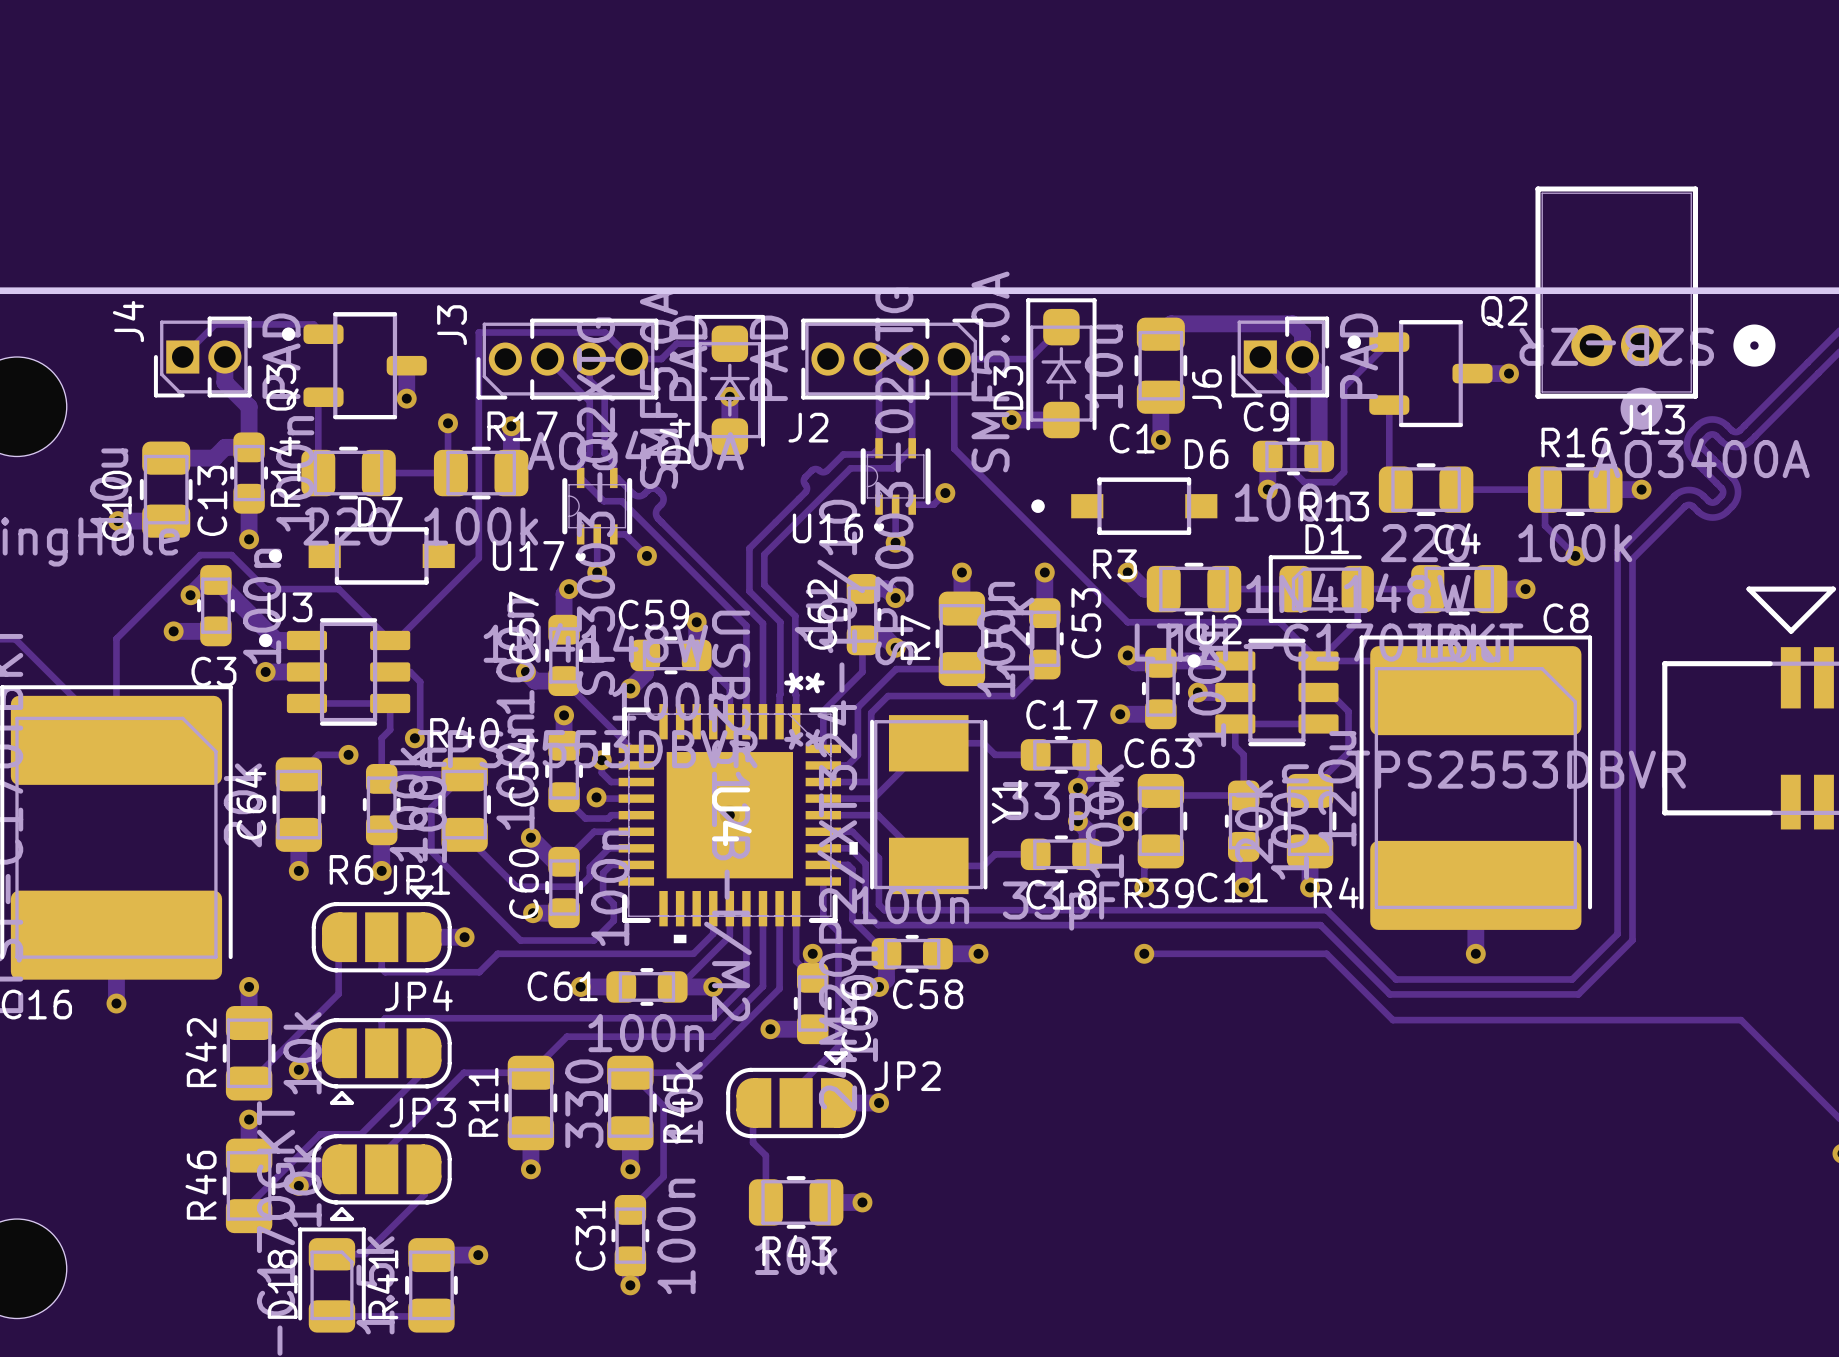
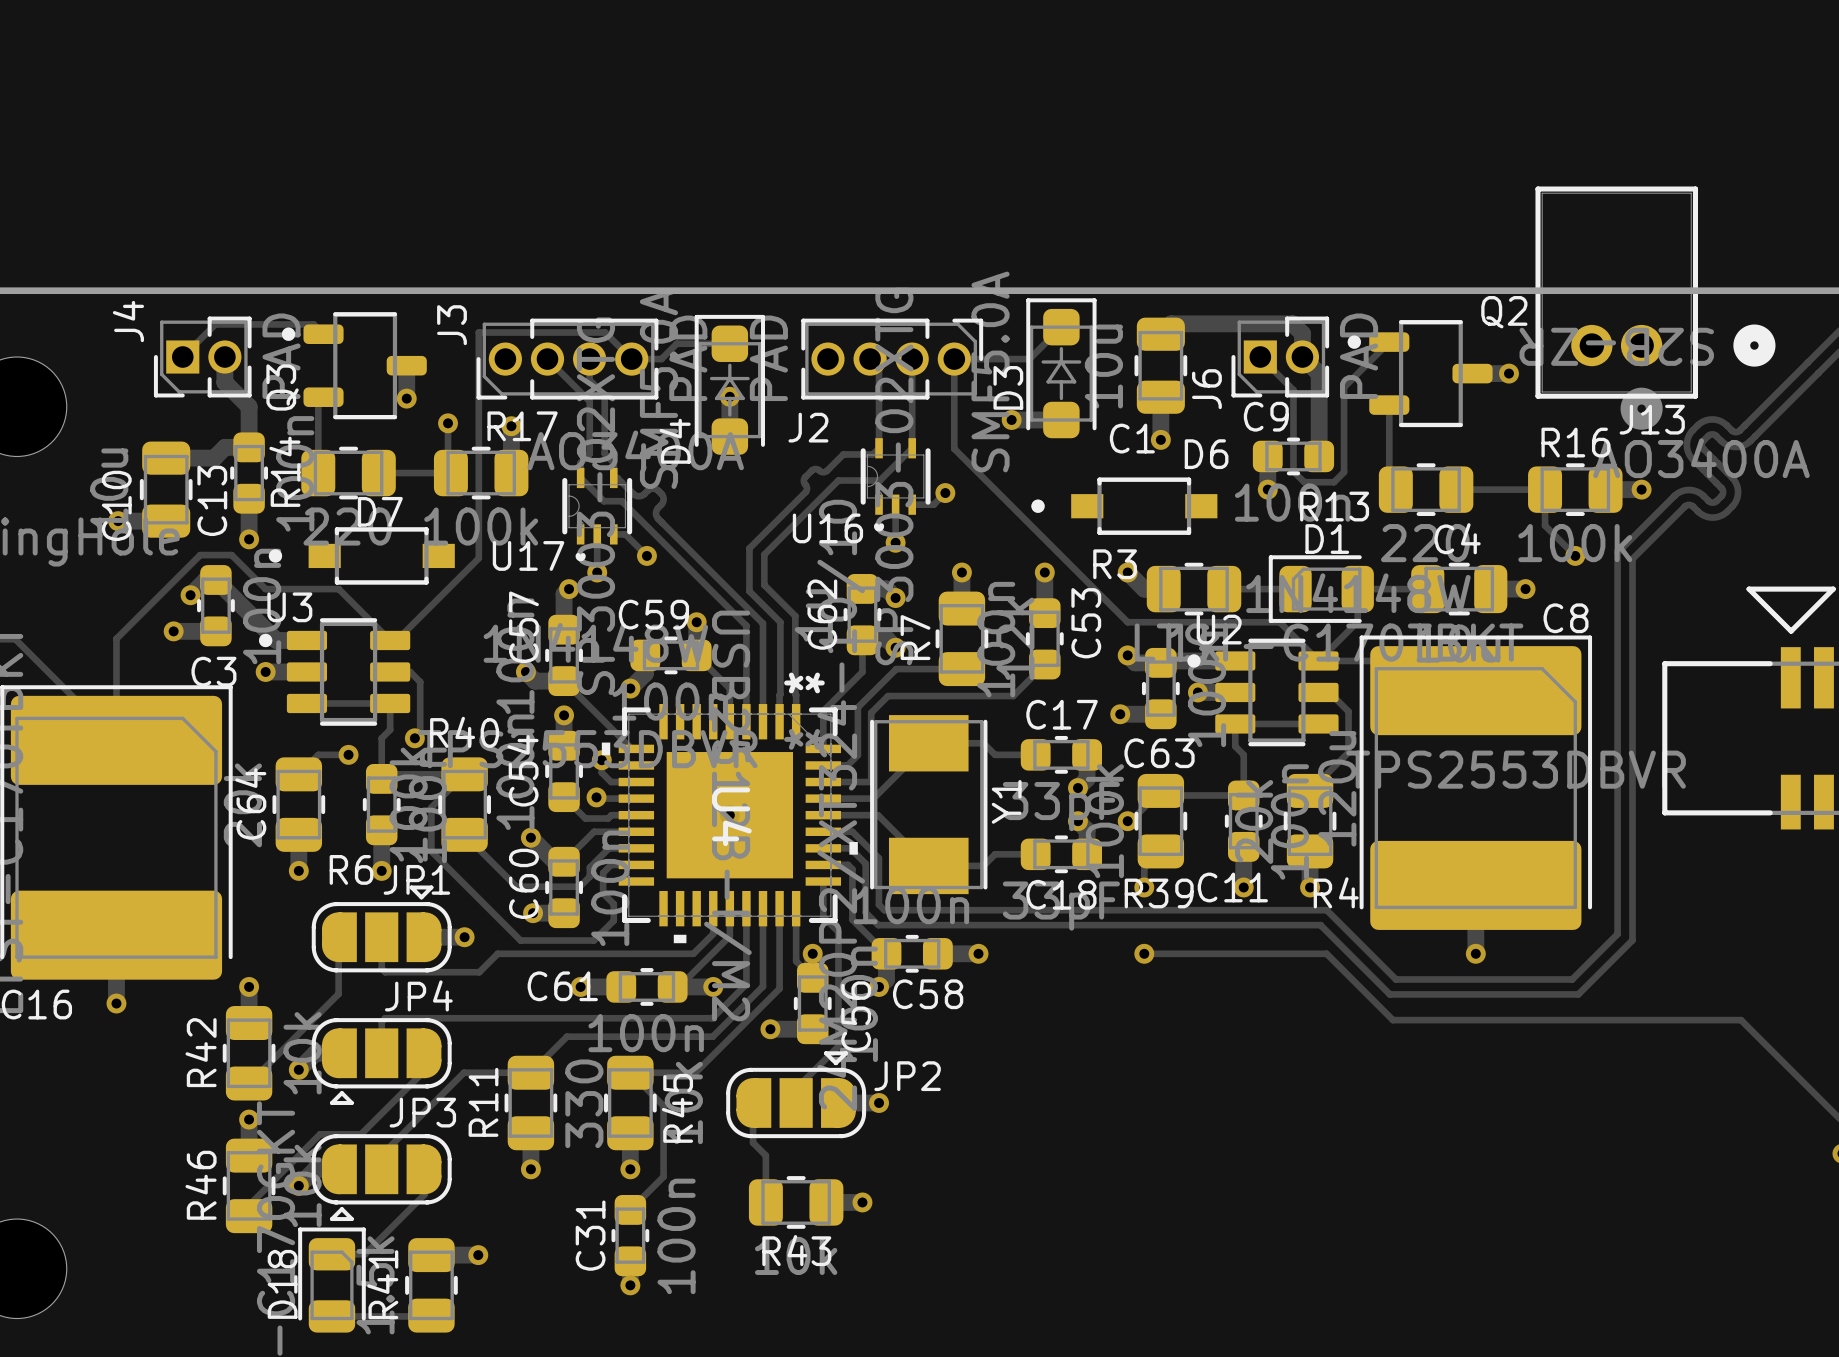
track: (892, 467) (850, 468) (838, 480) -> (892, 467) (879, 480) (838, 480)

